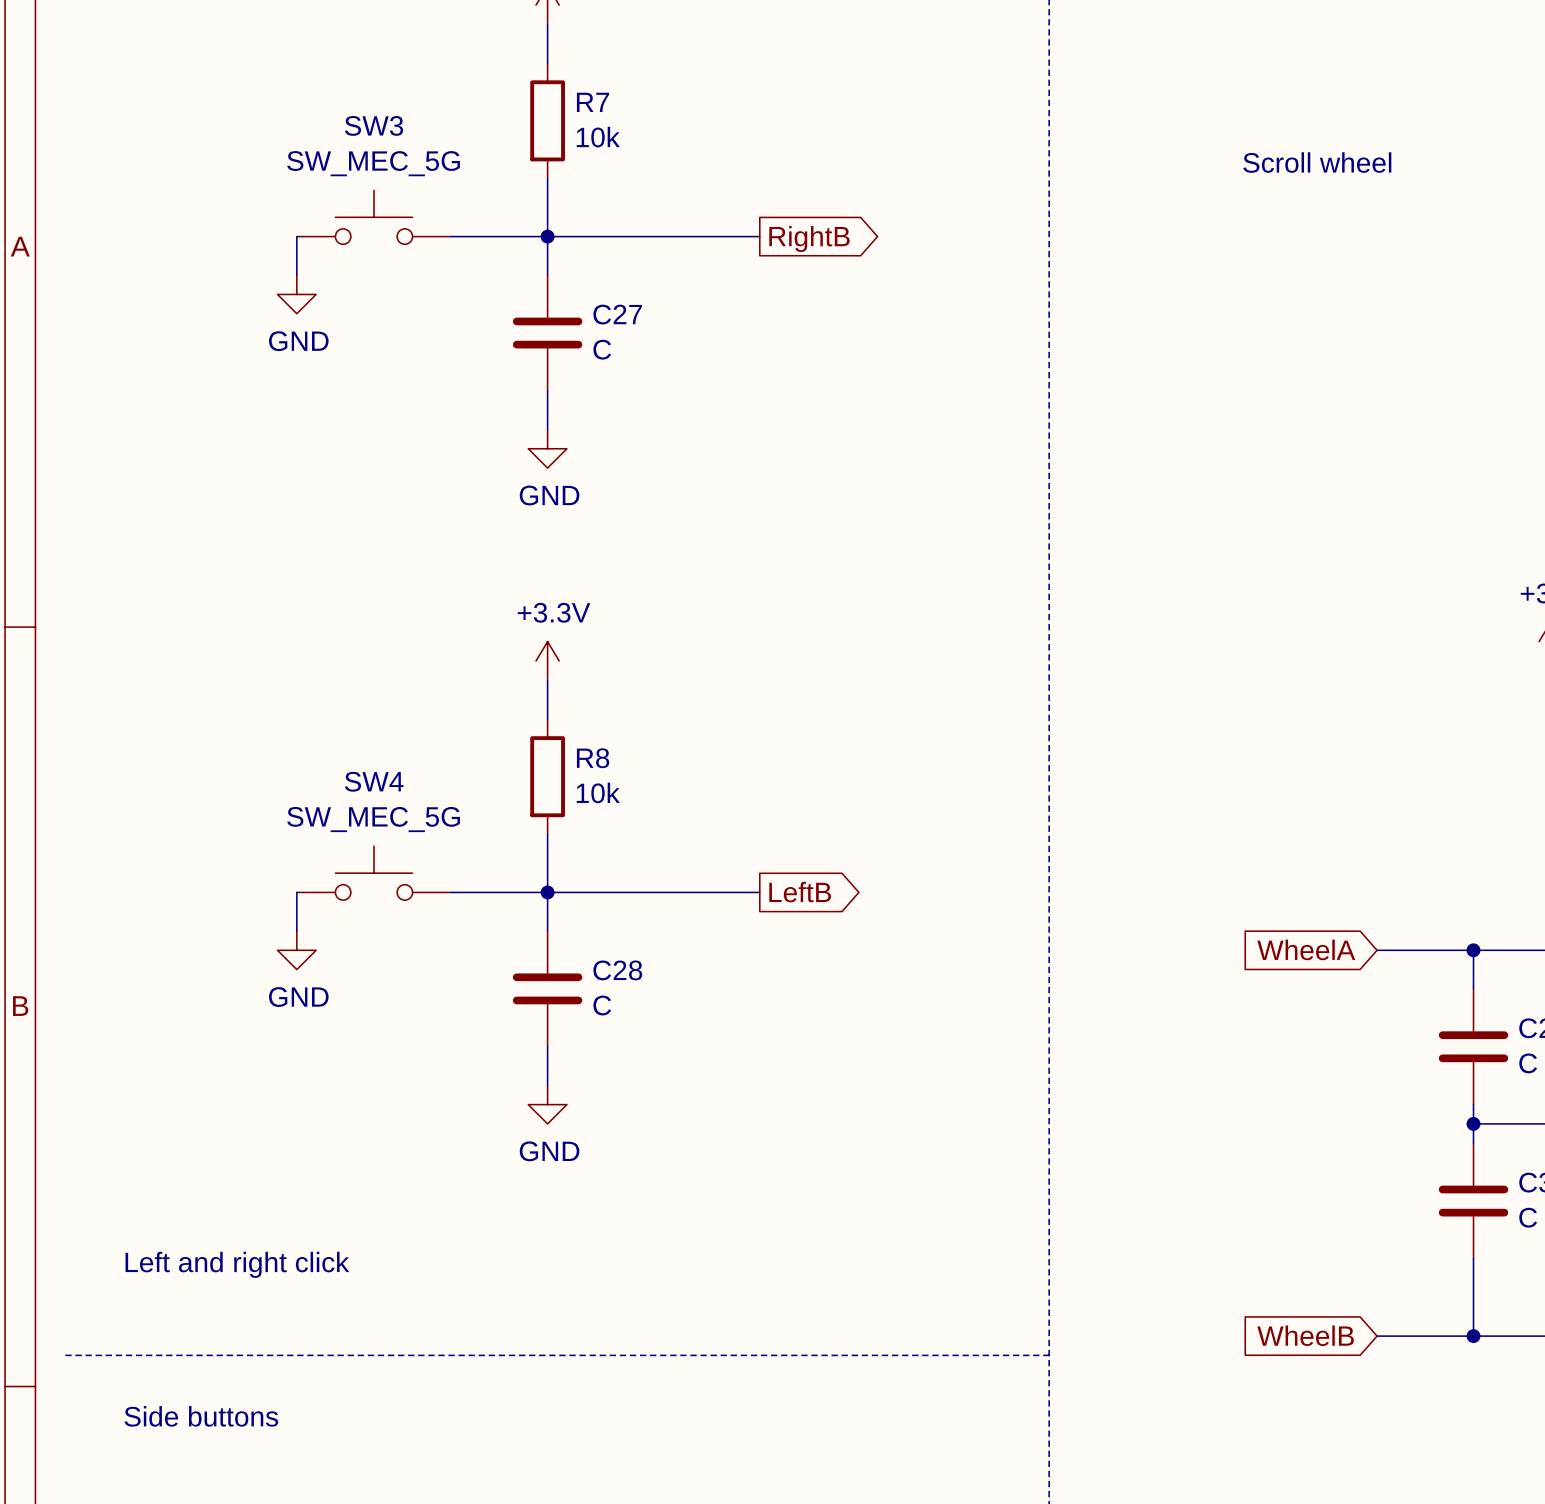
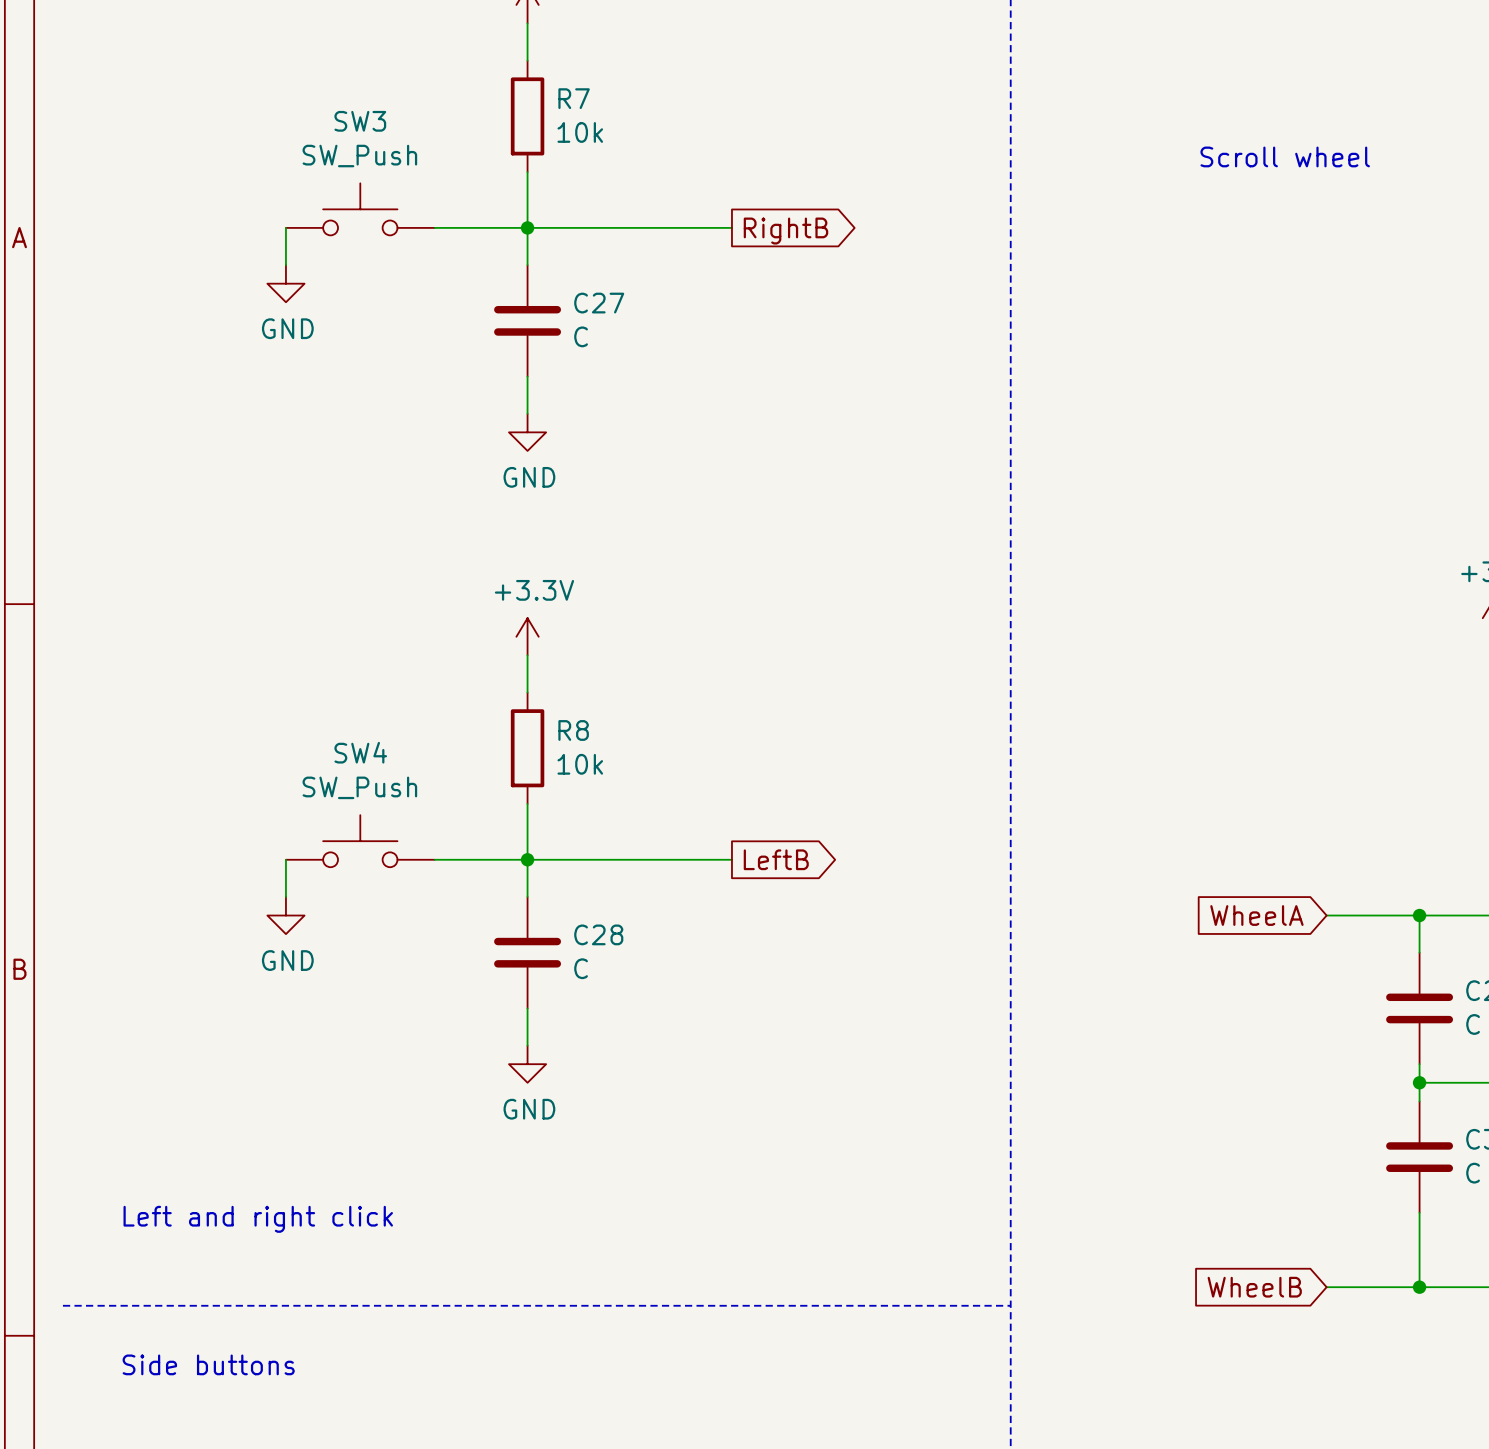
SW3 value: SW_MEC_5G (373, 163) -> SW_Push (359, 156)
SW4 value: SW_MEC_5G (373, 819) -> SW_Push (359, 787)

